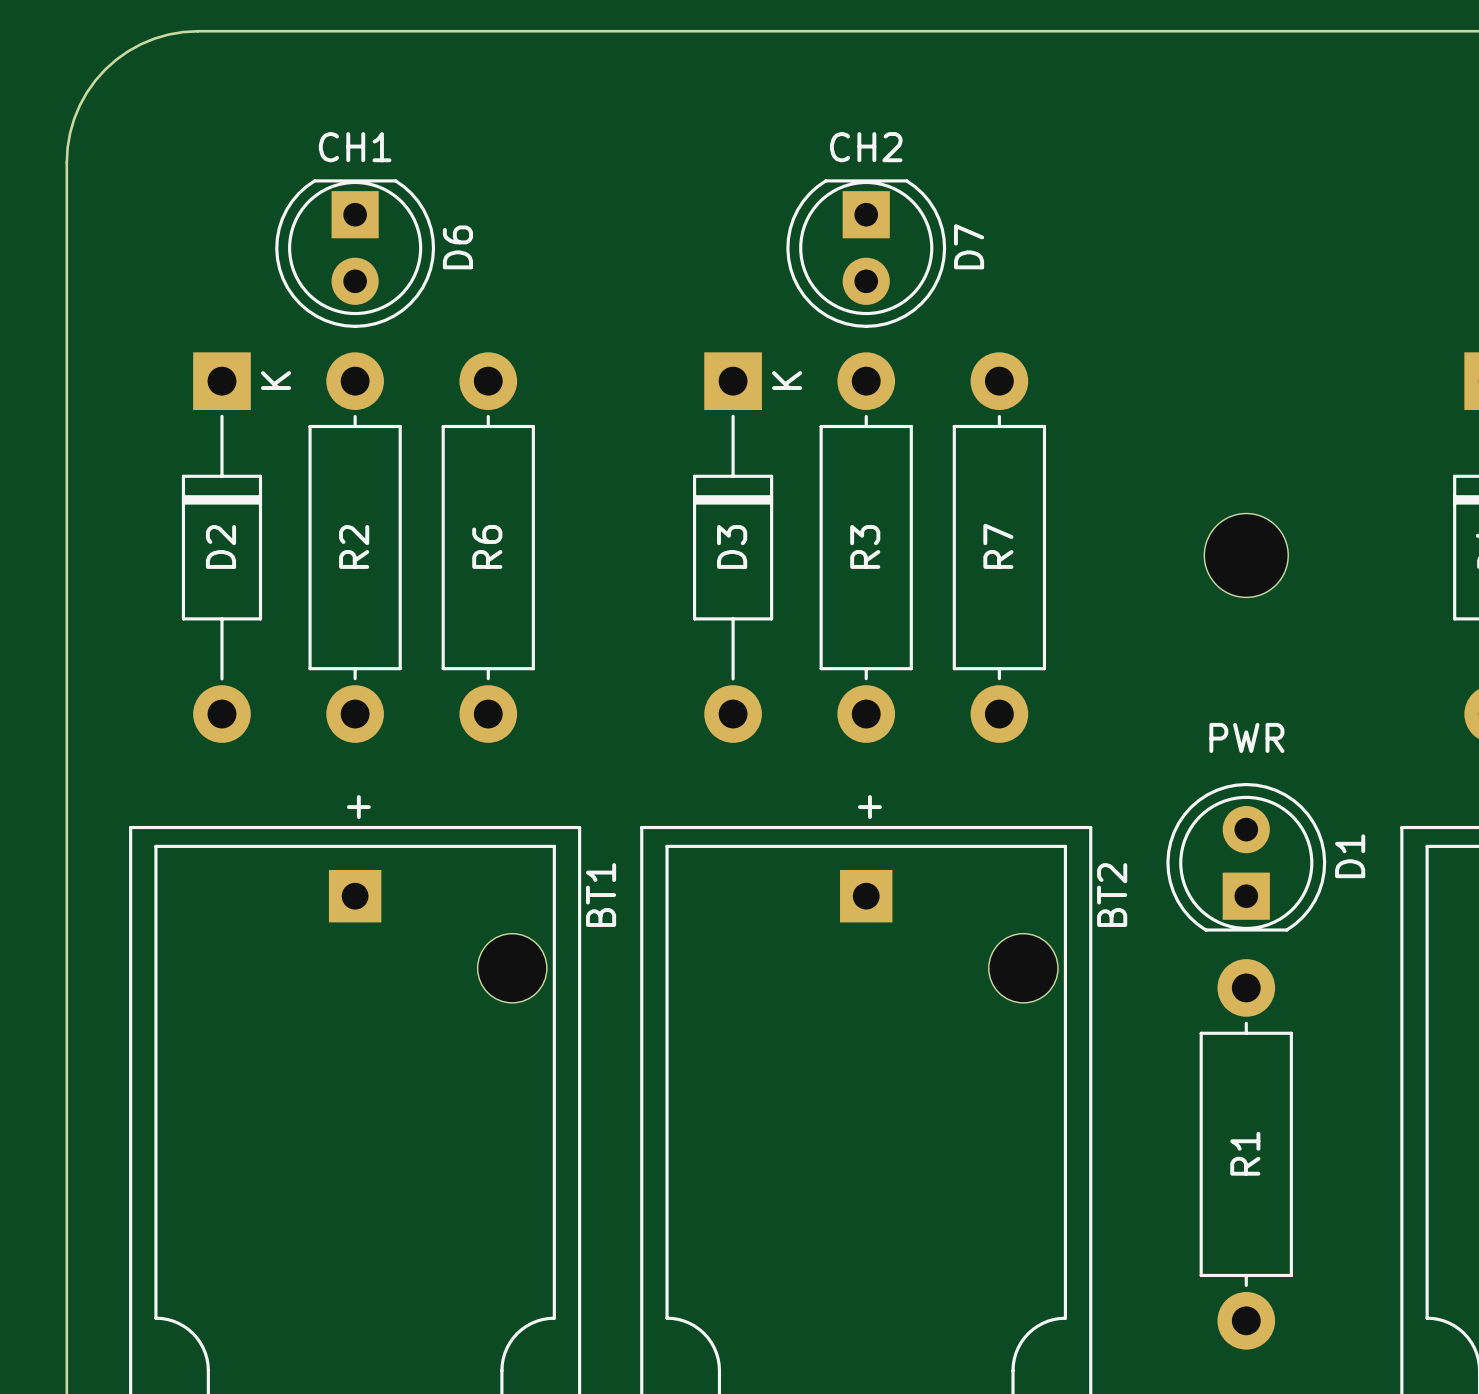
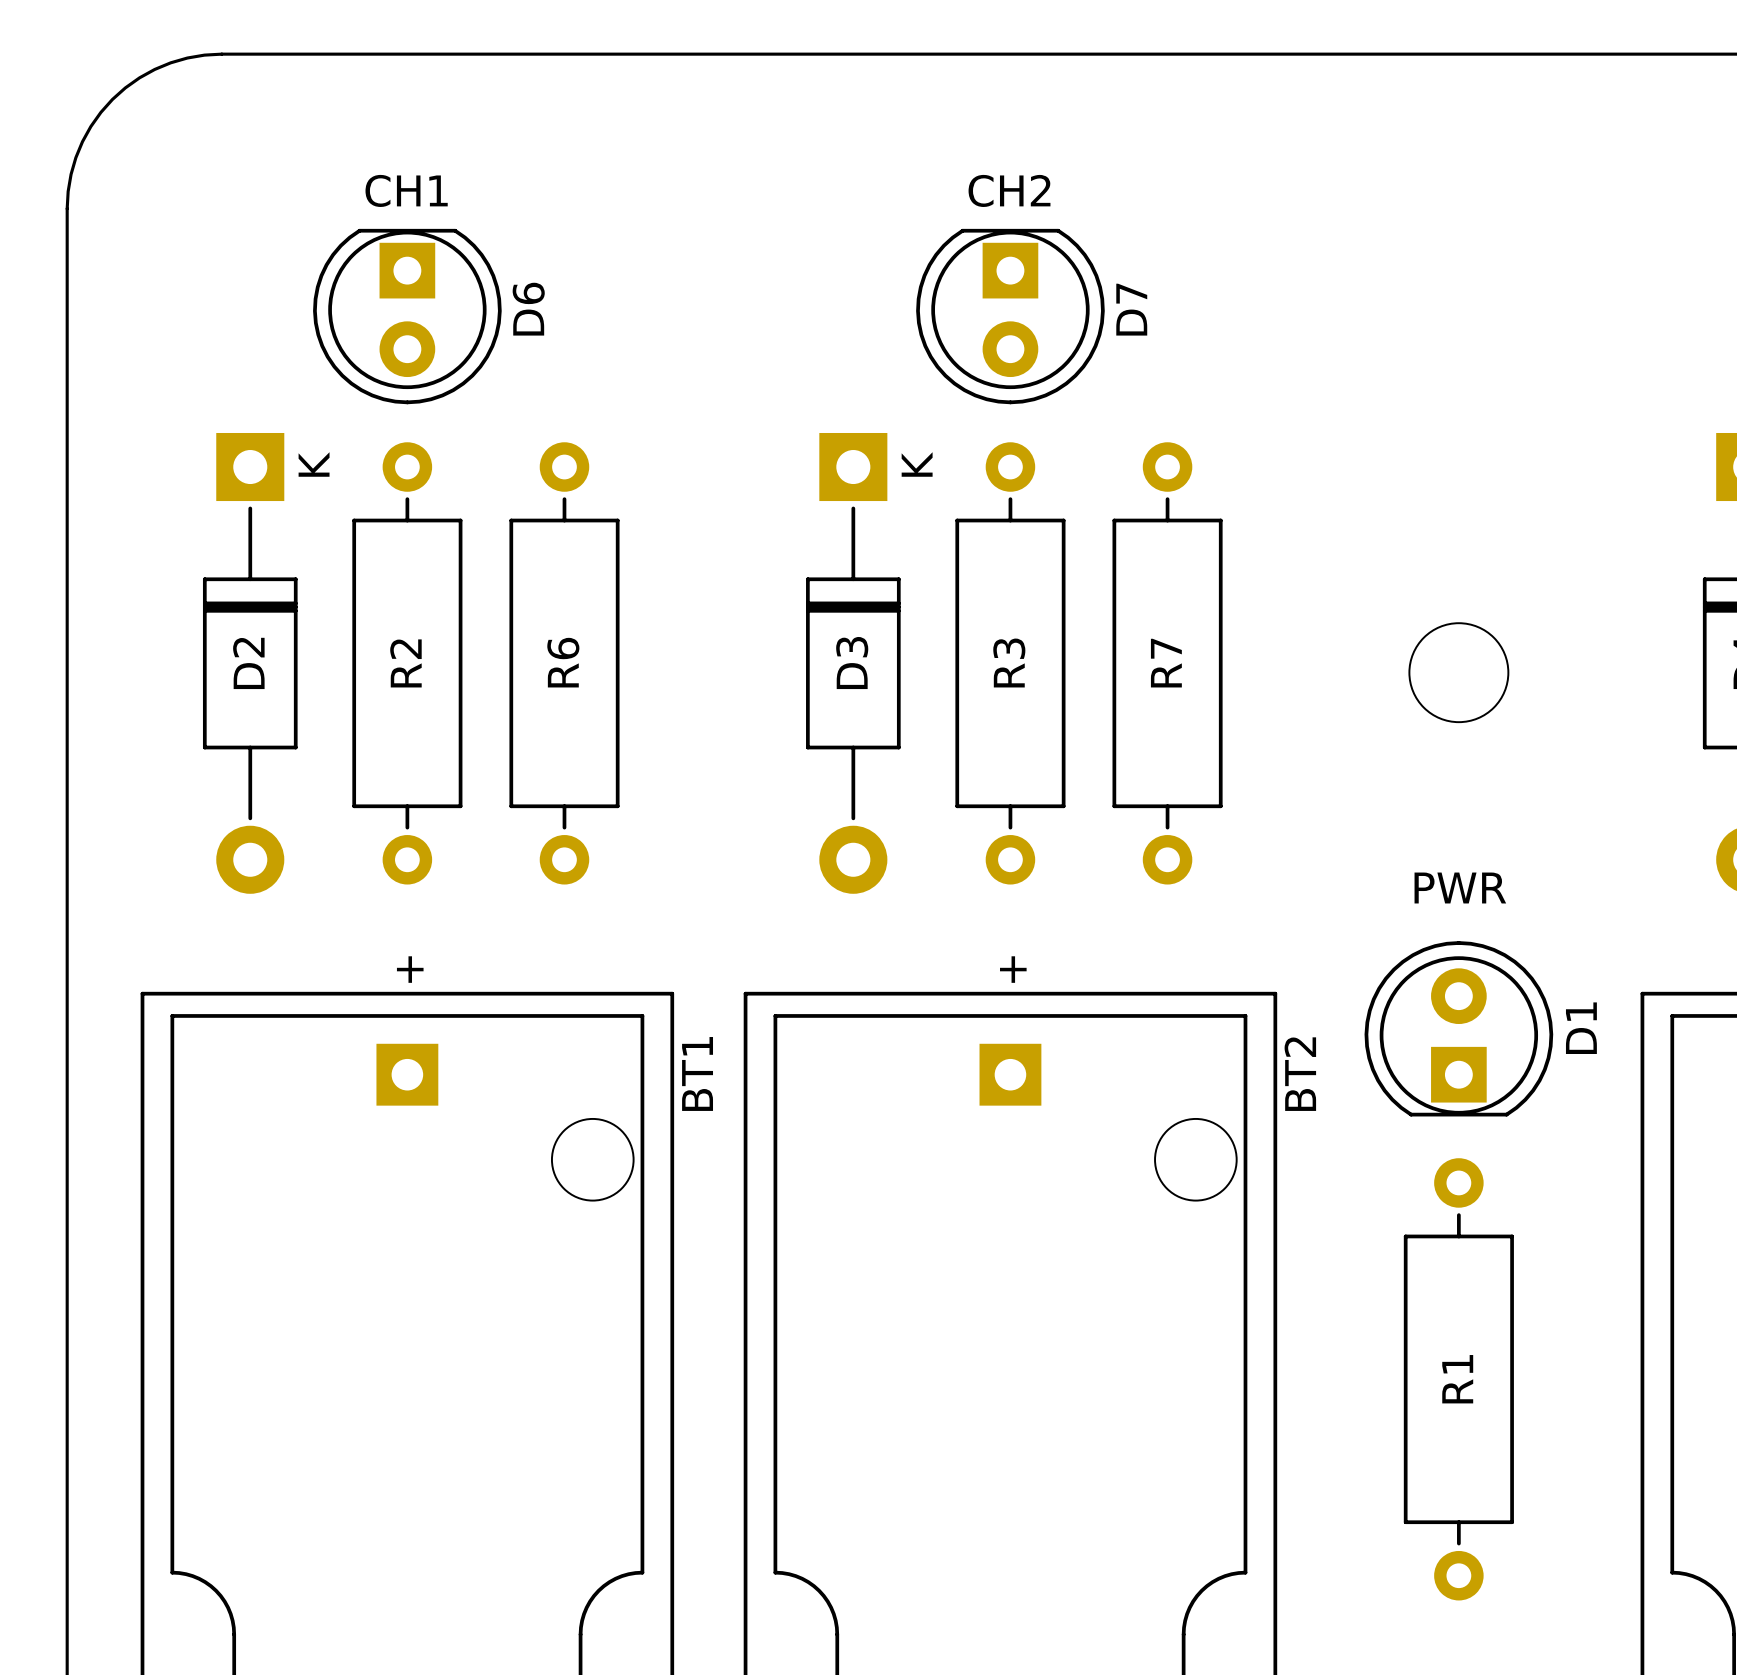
R2 footprint: [308, 352, 402, 743] -> [352, 442, 463, 885]
R6 footprint: [441, 352, 535, 743] -> [509, 442, 620, 885]
R3 footprint: [819, 352, 913, 743] -> [955, 442, 1066, 885]
R7 footprint: [952, 352, 1047, 743] -> [1112, 442, 1223, 885]
R1 footprint: [1199, 959, 1293, 1350] -> [1403, 1158, 1514, 1601]

